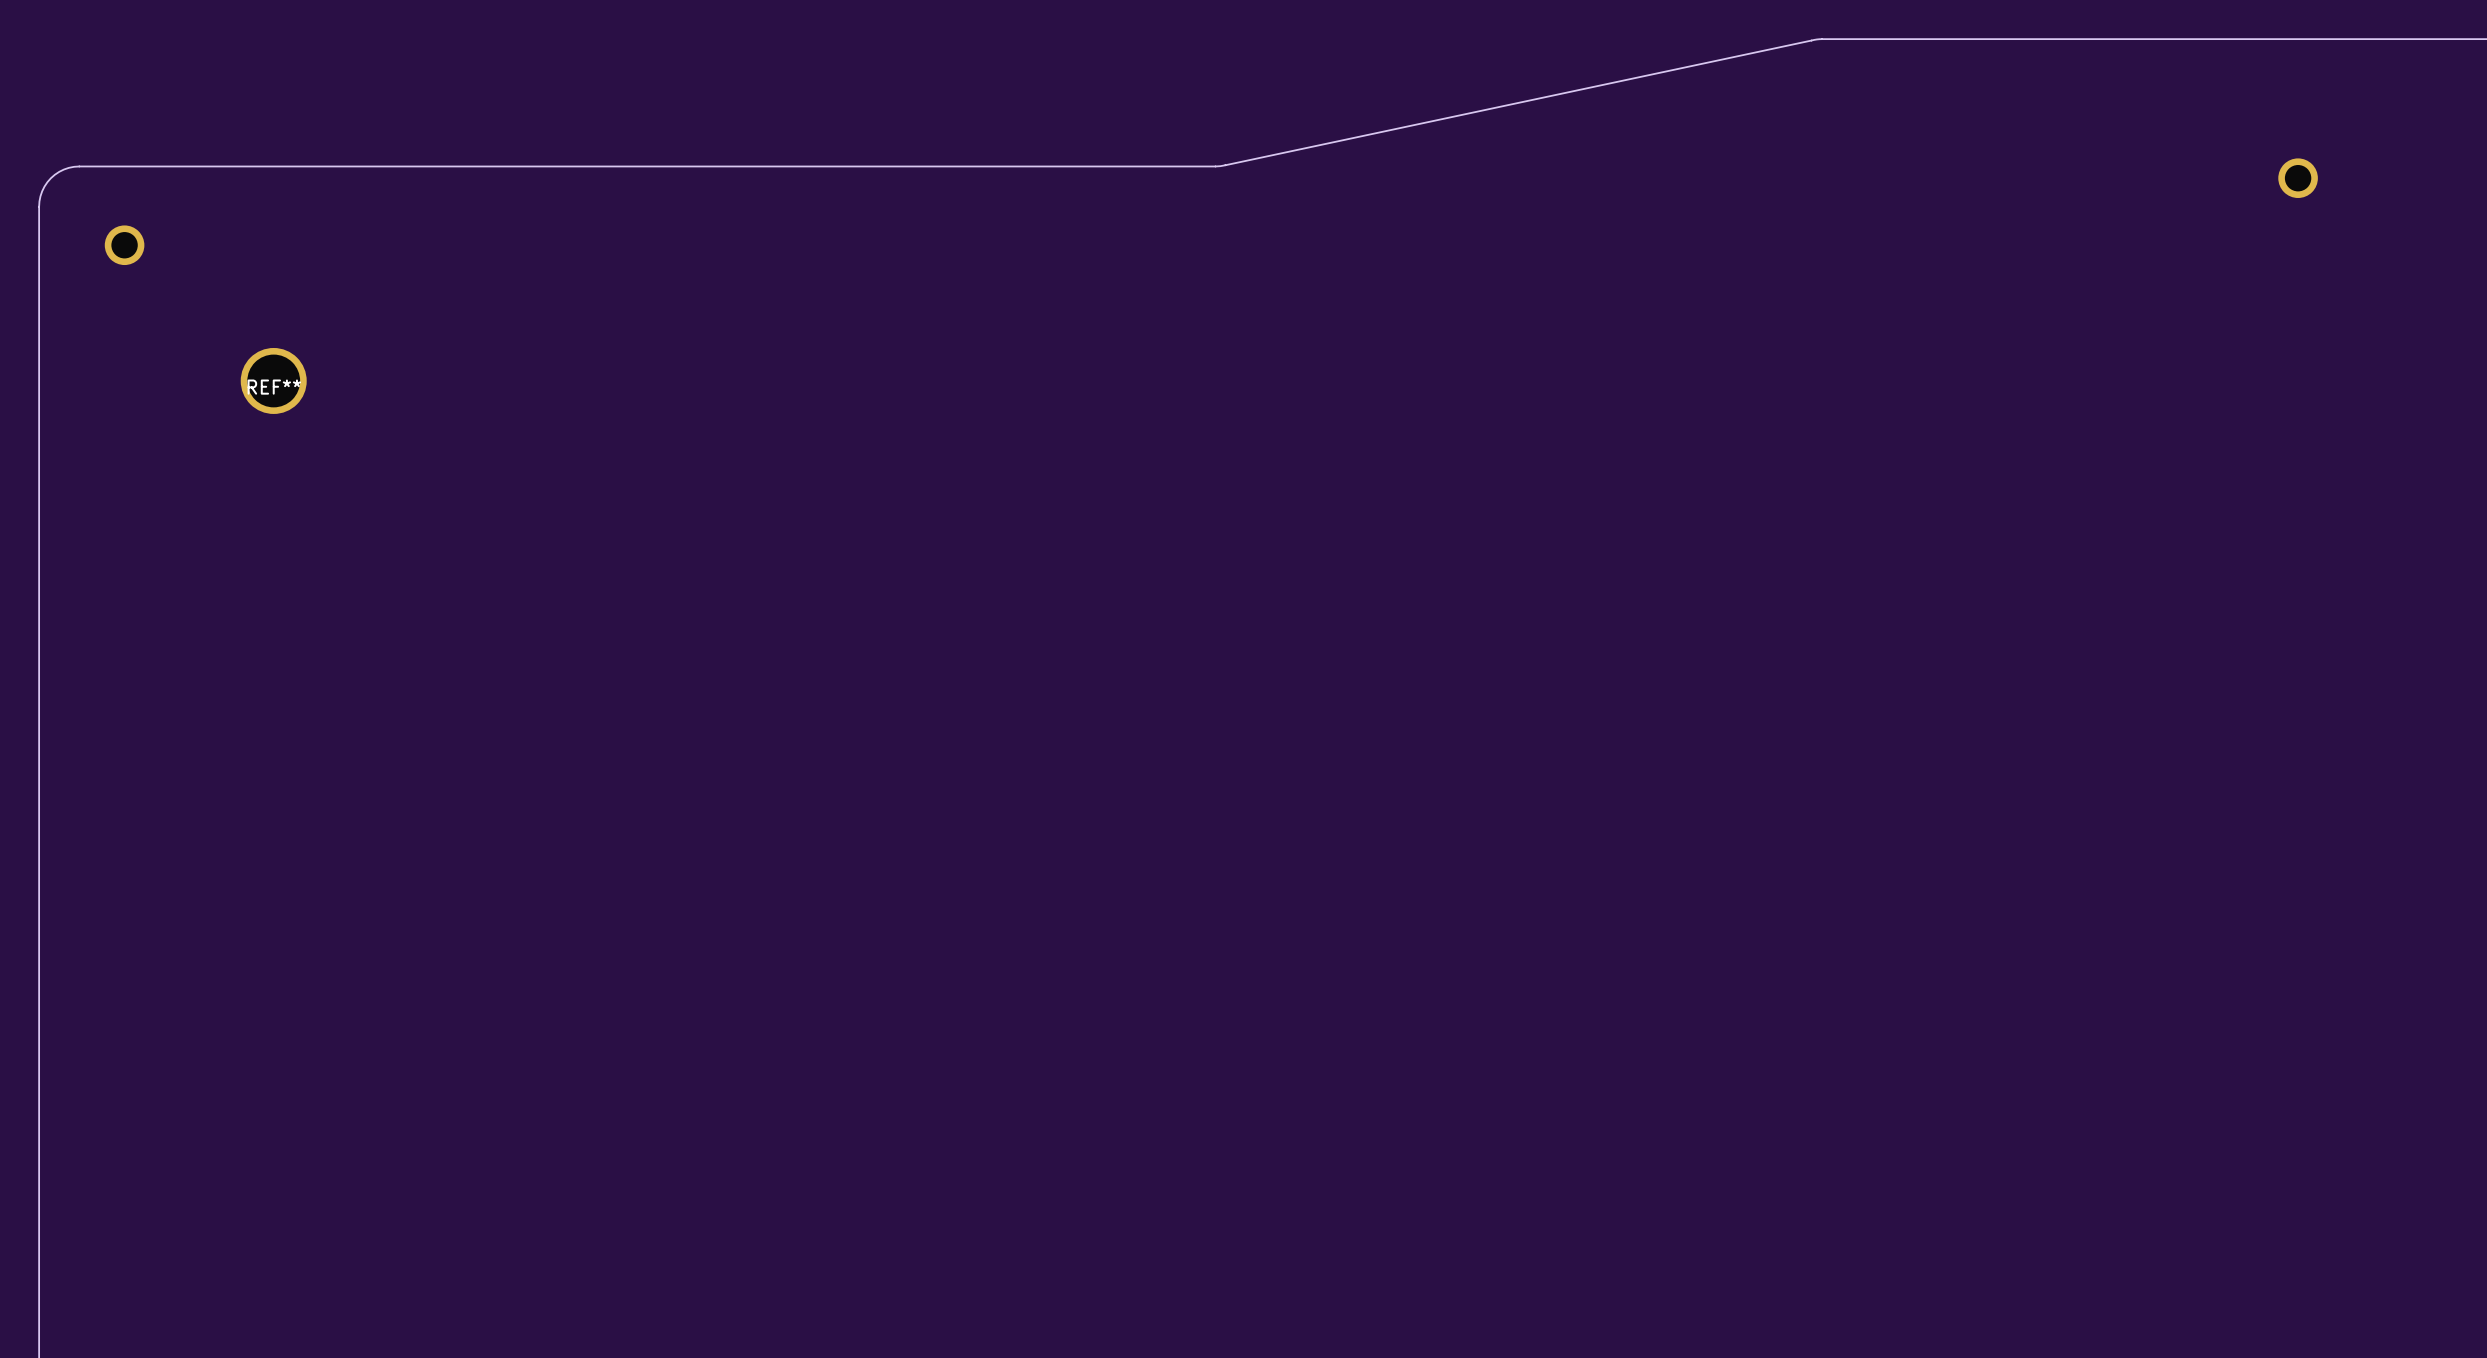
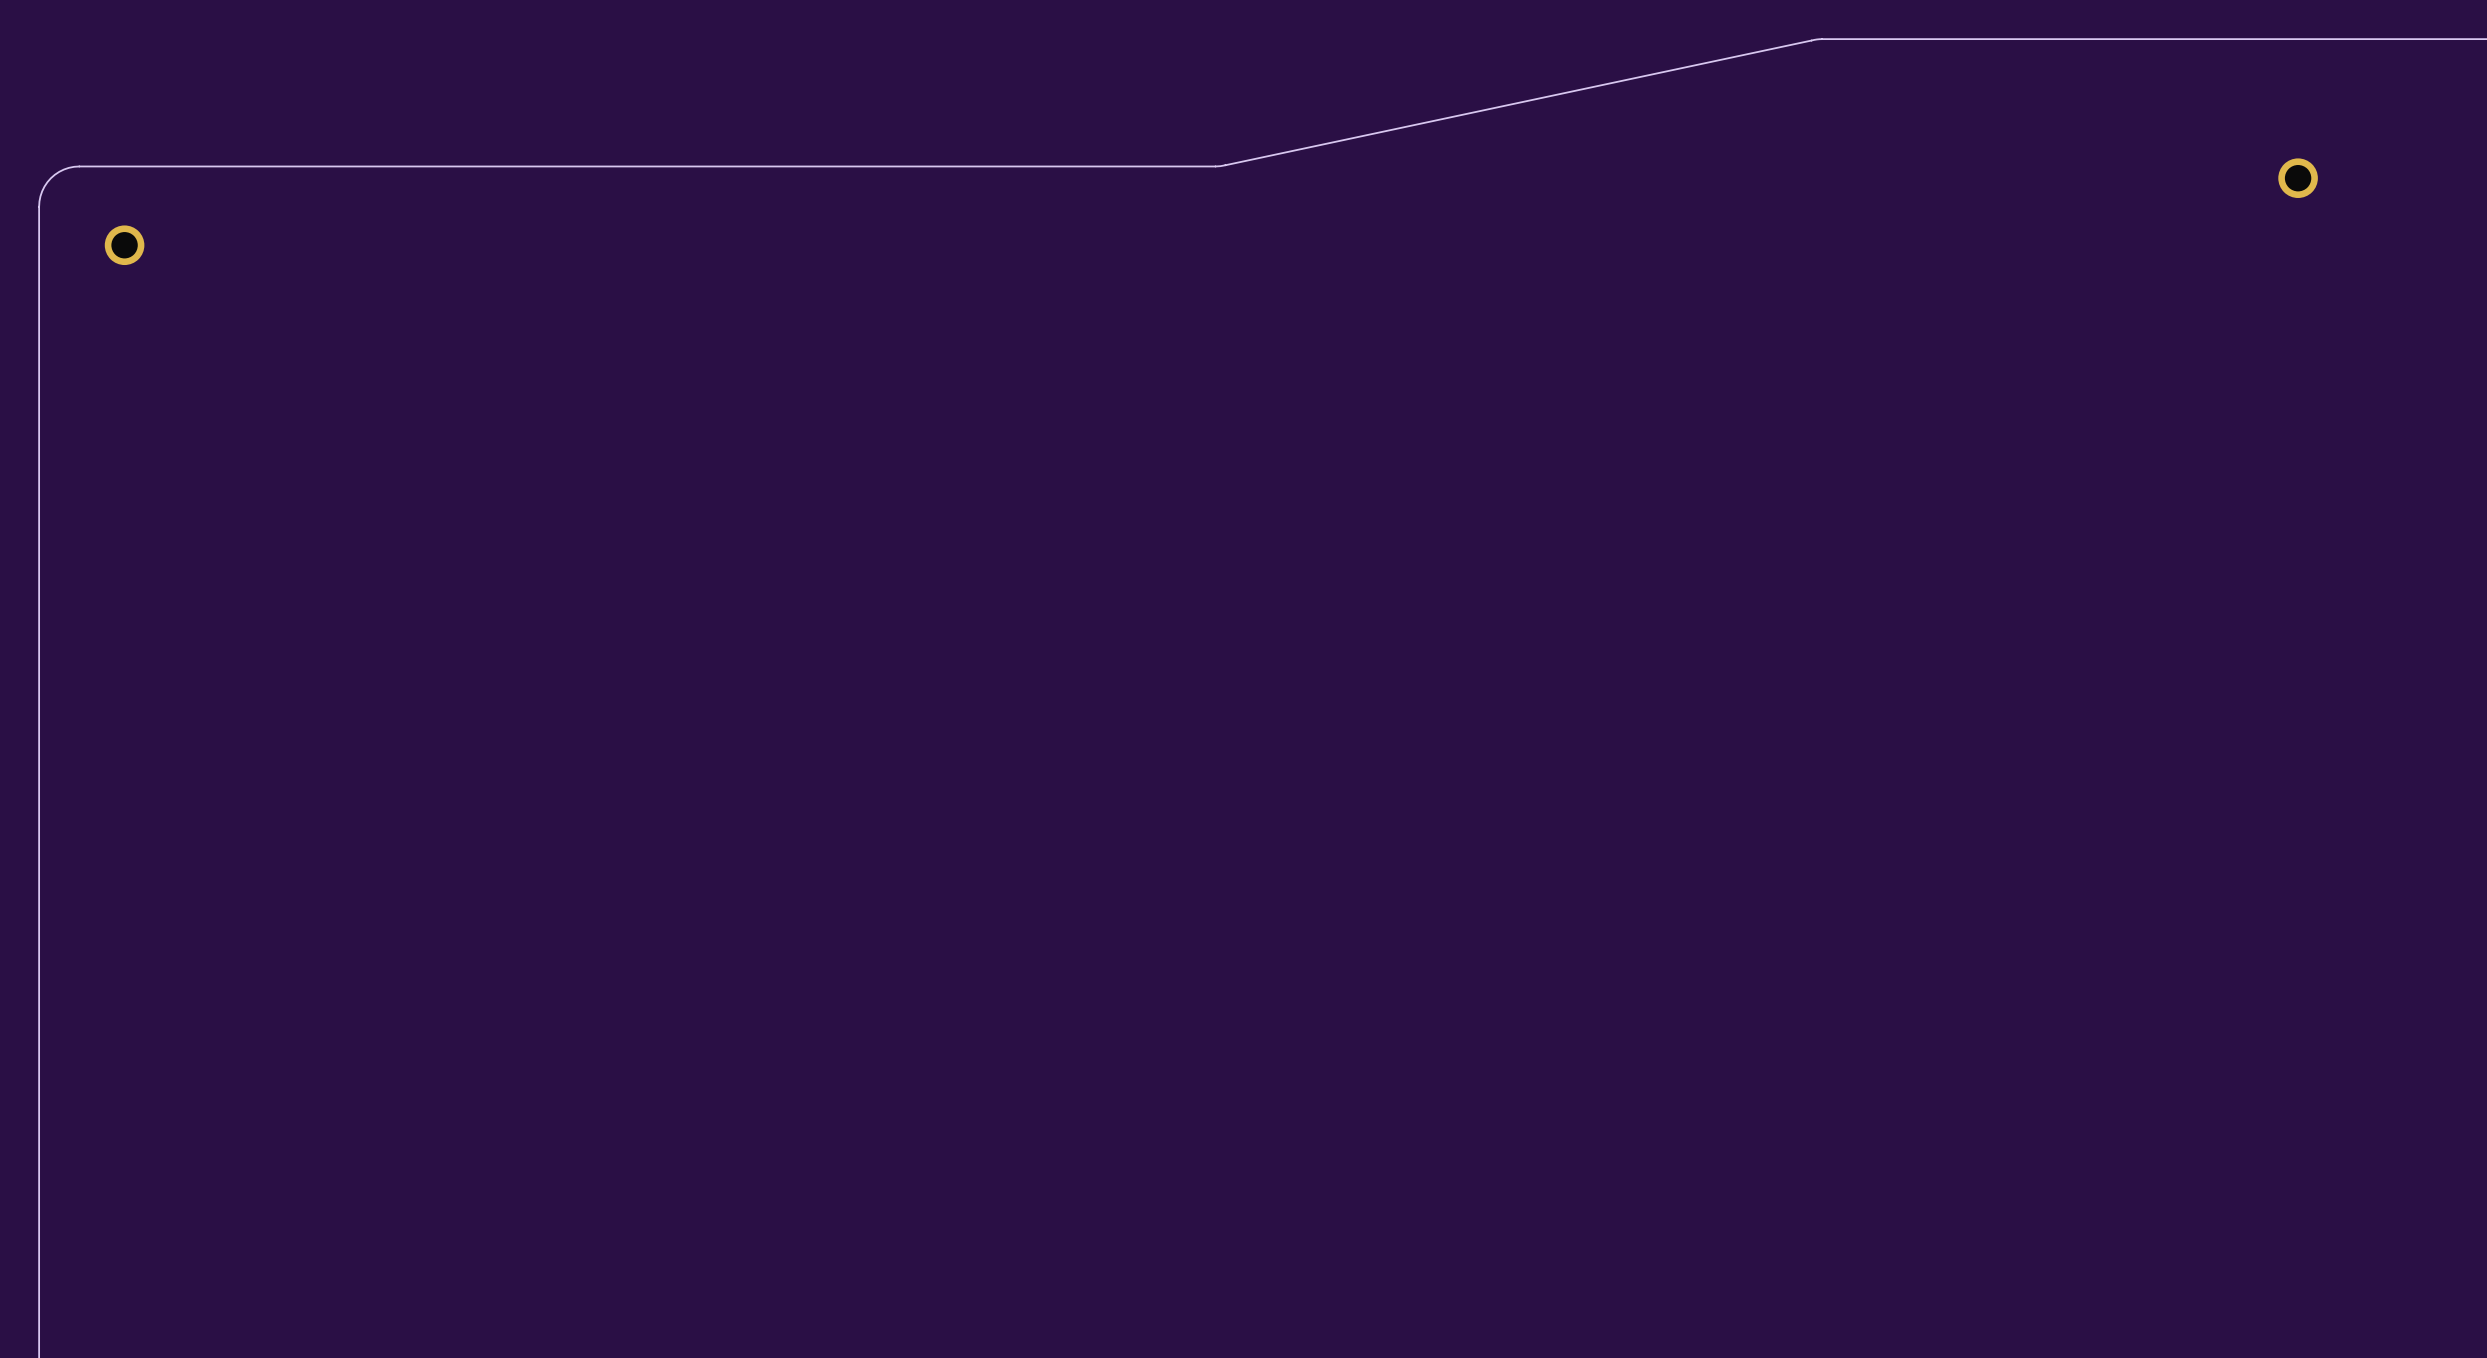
REF**: (273, 380) -> none

